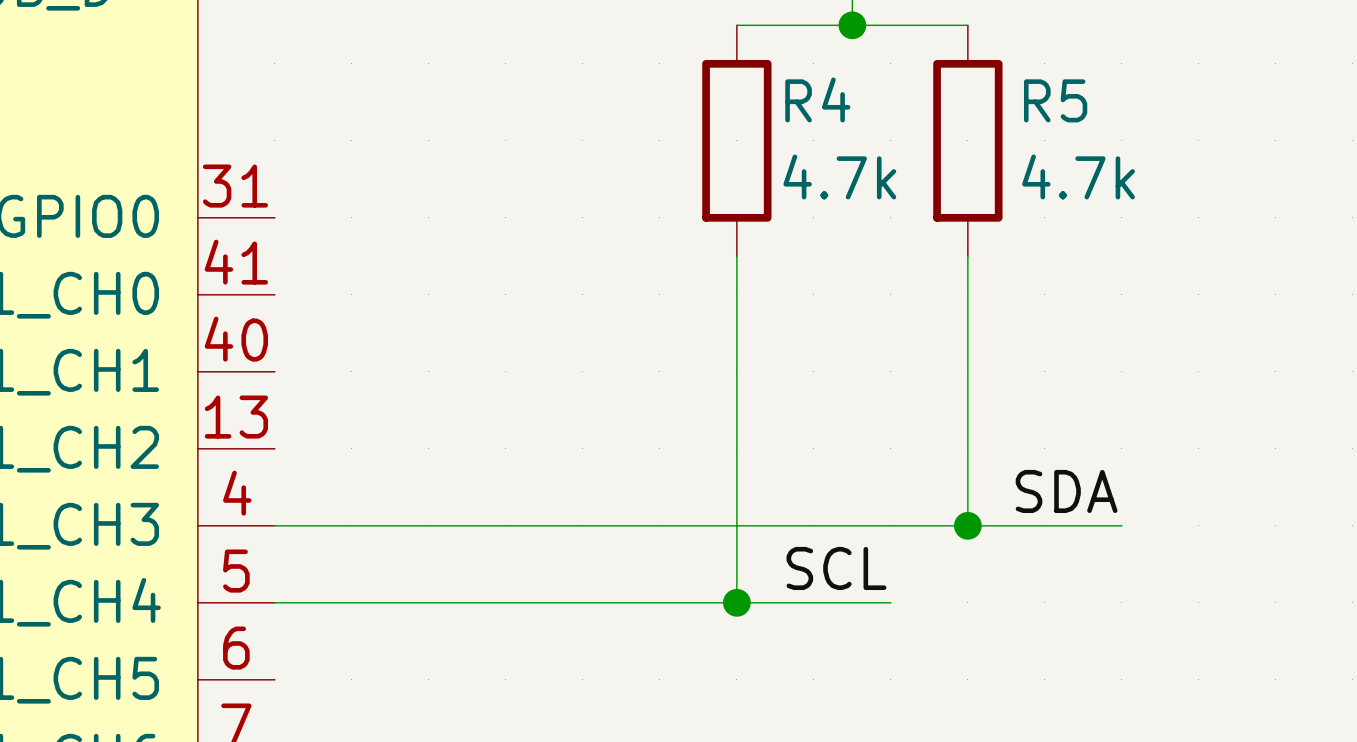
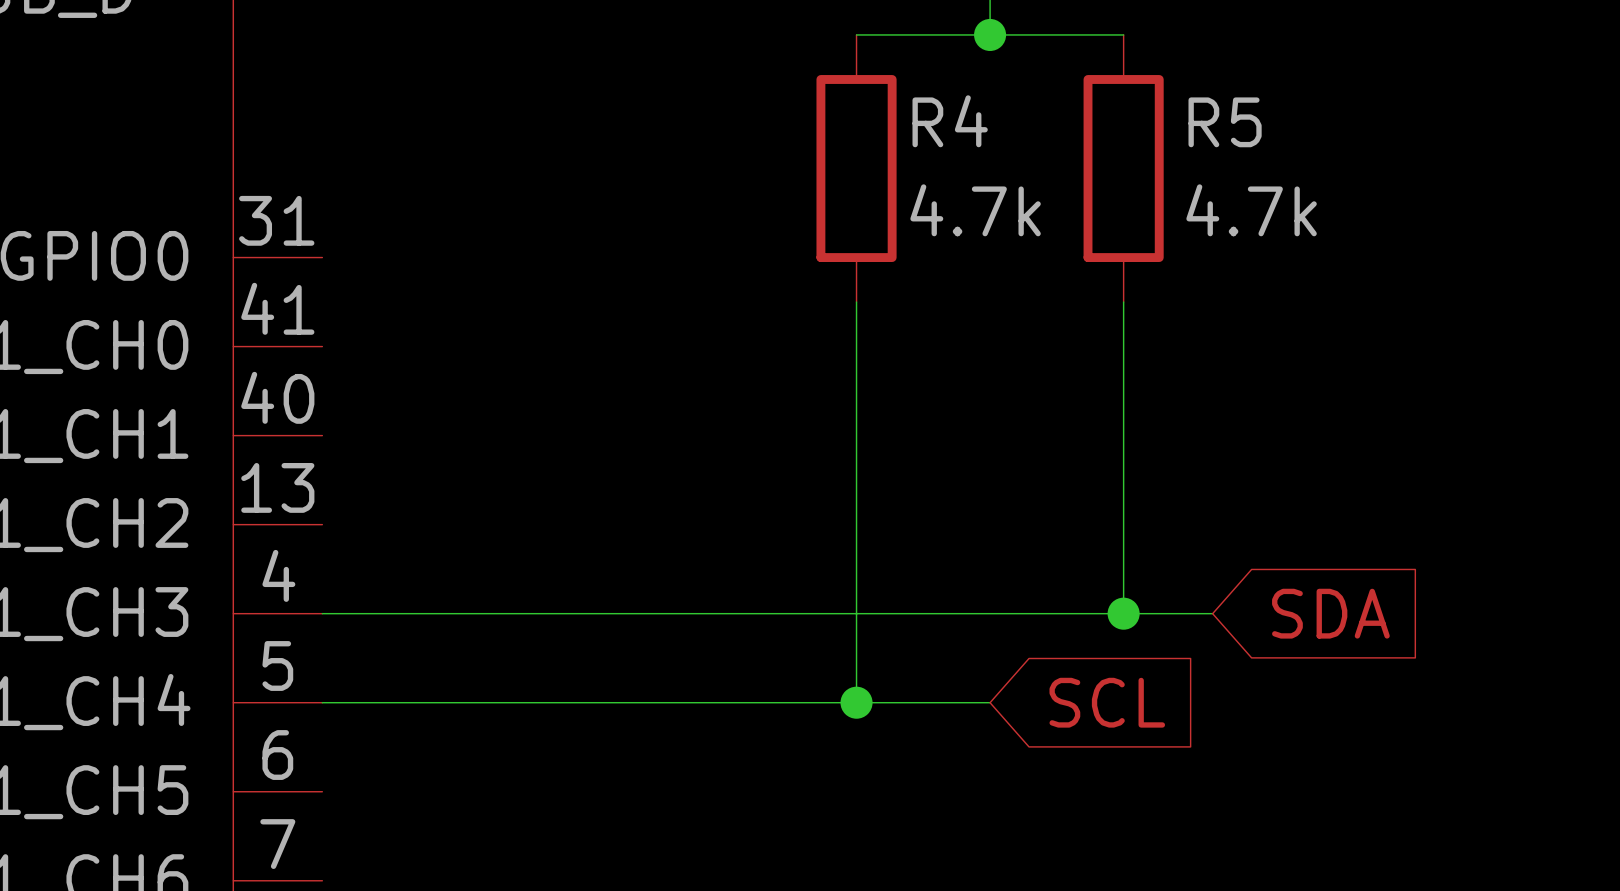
label: SDA (1066, 491) -> none
wire: (1044, 525) (1121, 525) -> none
global label: none -> SDA (1330, 613)
label: SCL (836, 568) -> none
wire: (852, 602) (890, 602) -> none
global label: none -> SCL (1107, 702)

